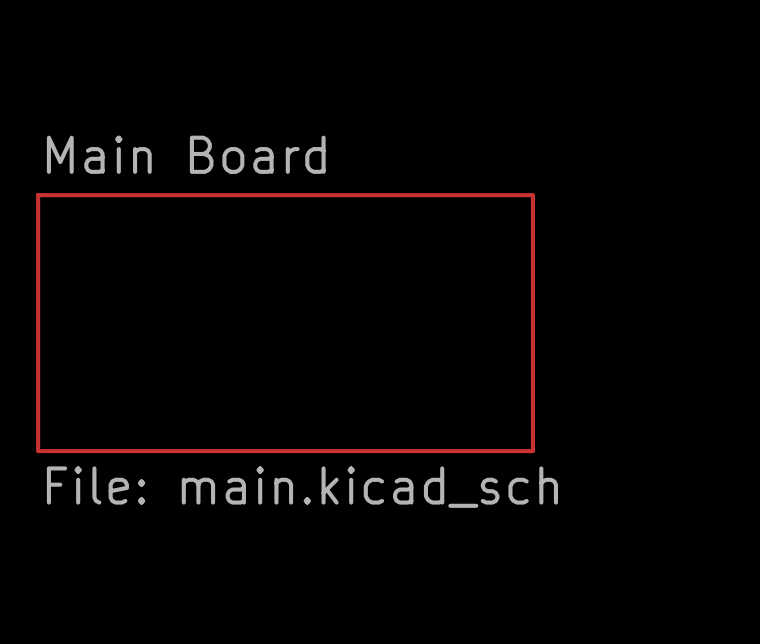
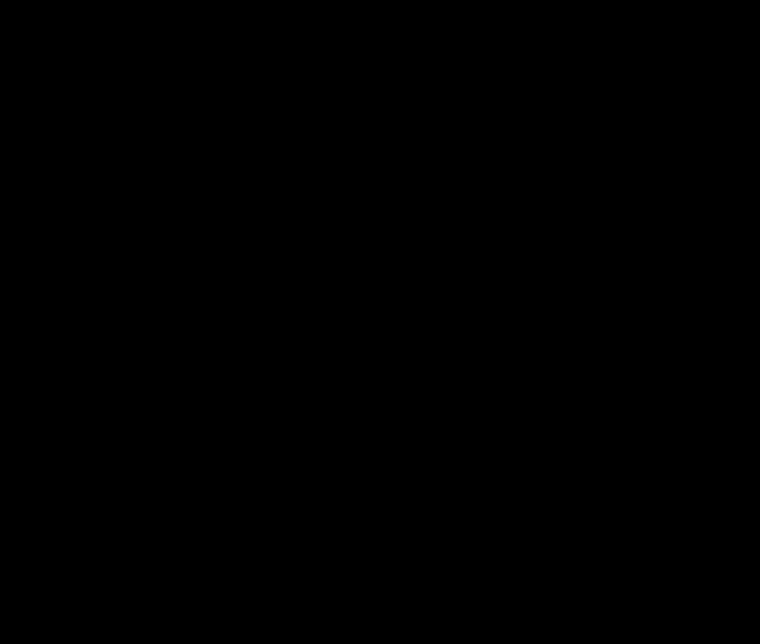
sheet Main Board: File: main.kicad_sch (285, 323) -> none

